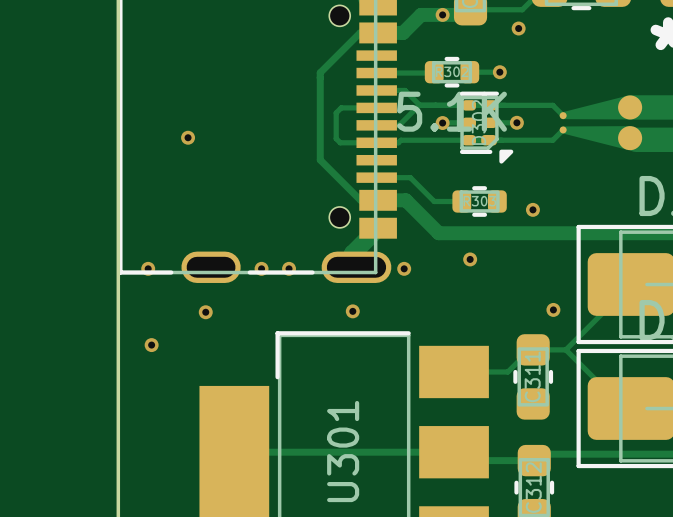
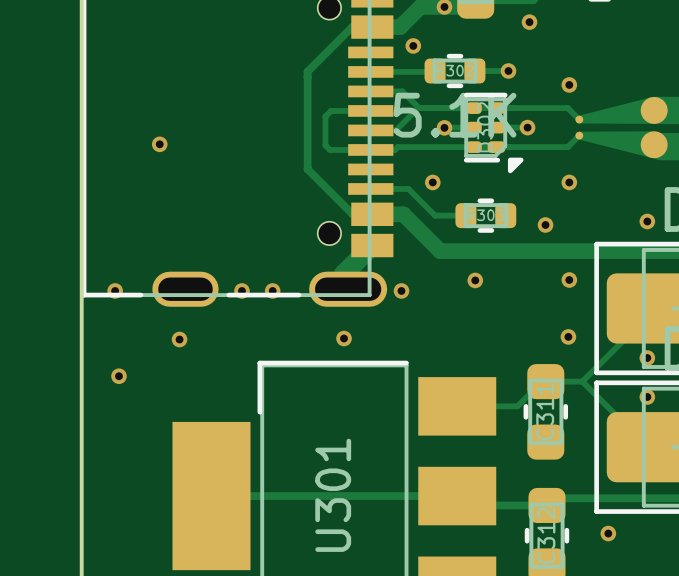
via: none -> (413, 45)
via: none -> (569, 84)
via: none -> (432, 182)
via: none -> (569, 182)
via: none -> (647, 221)
via: none -> (569, 279)
via: none -> (647, 358)
via: none -> (647, 397)
via: none -> (608, 533)

